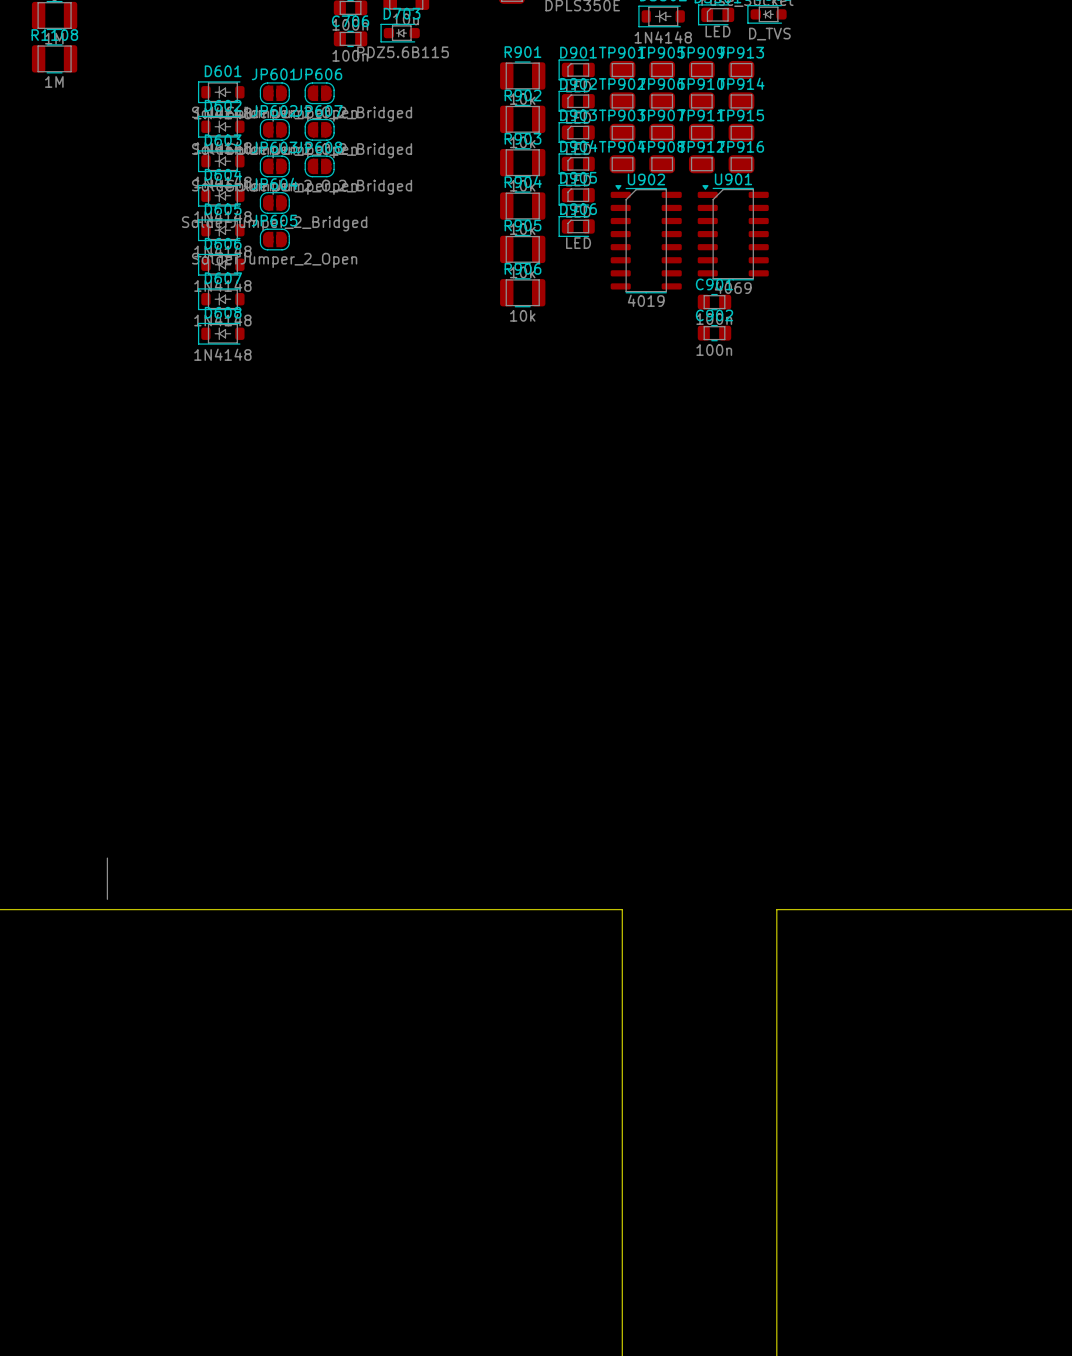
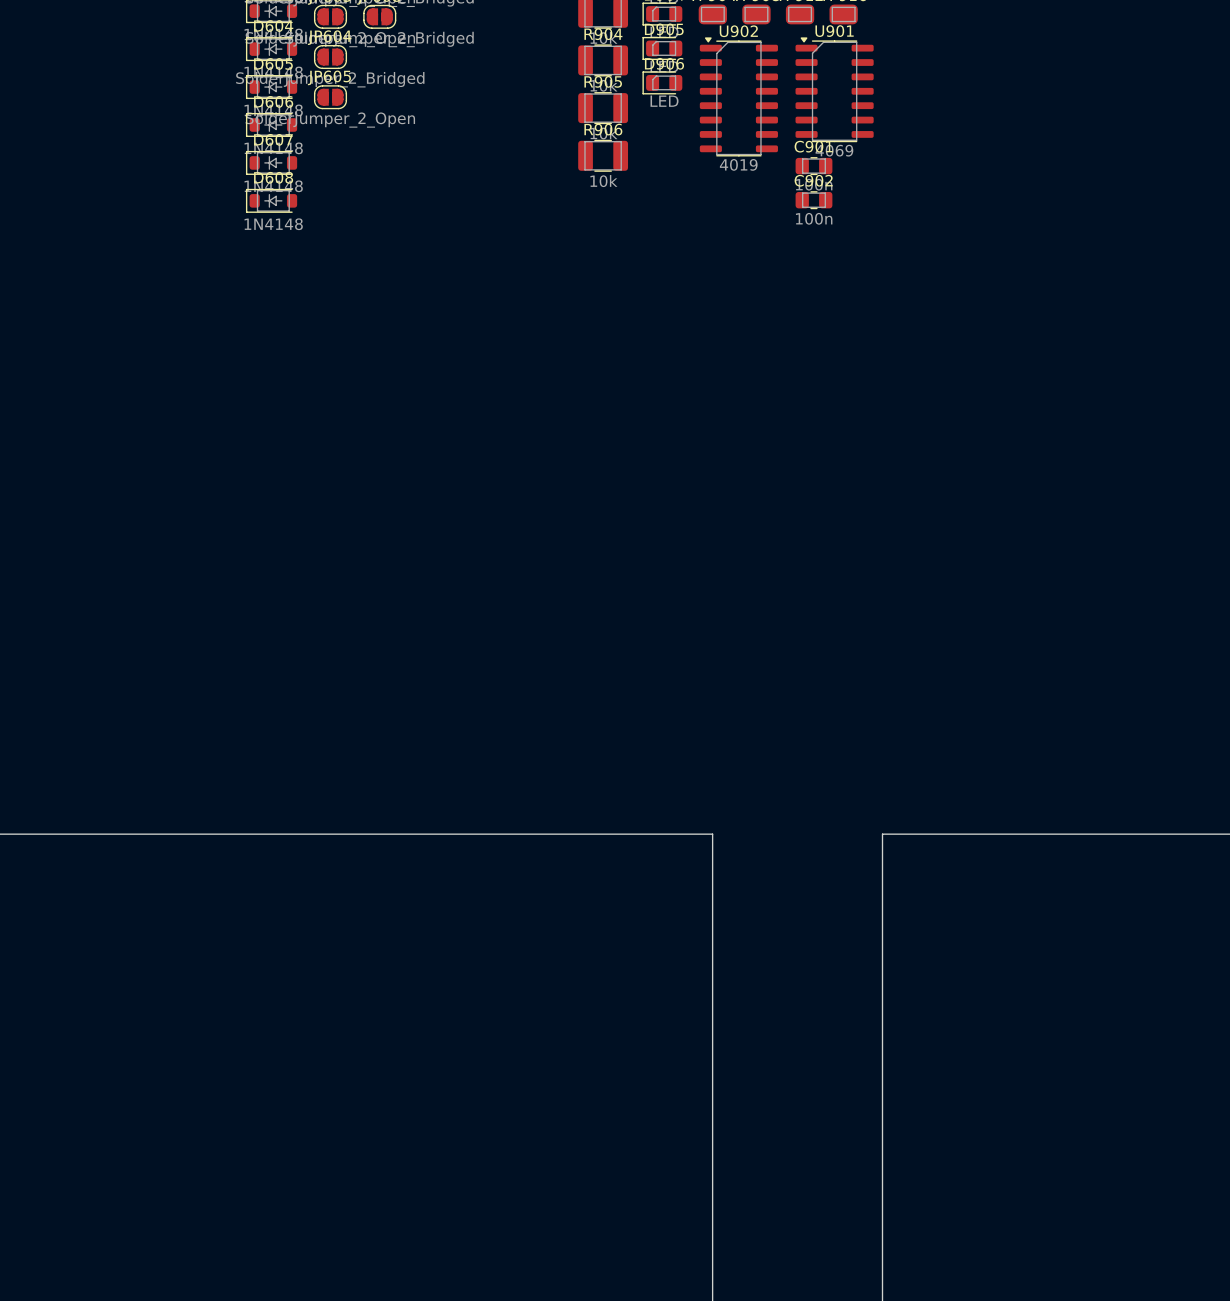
line: (107, 858) (107, 899) -> none

